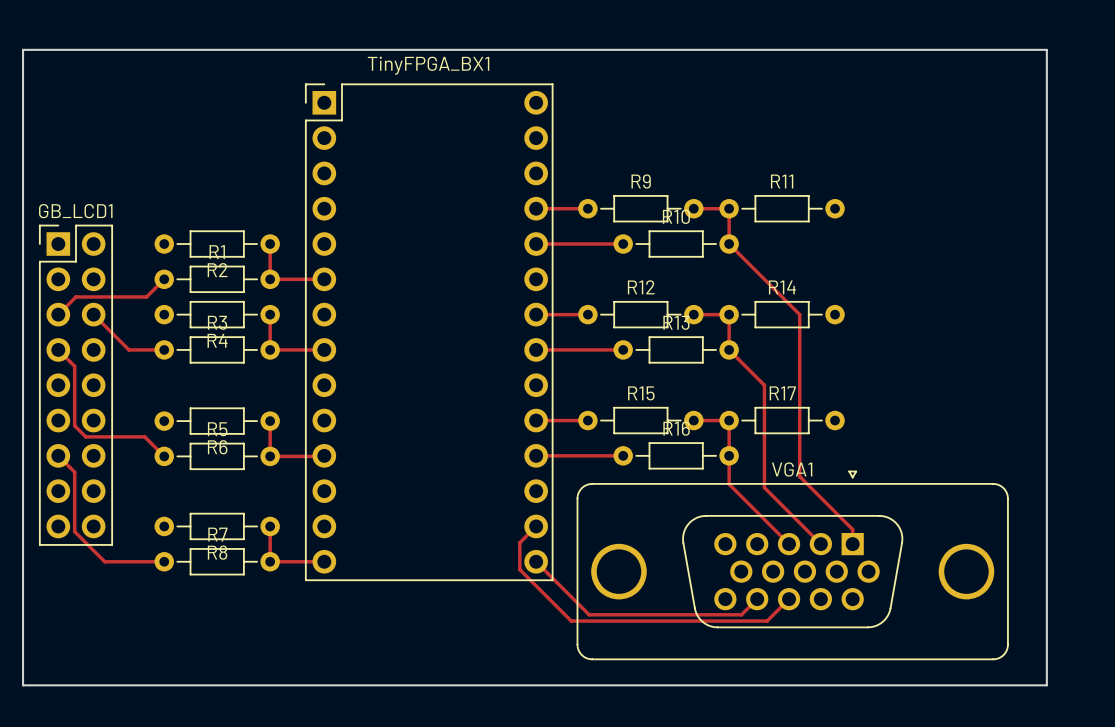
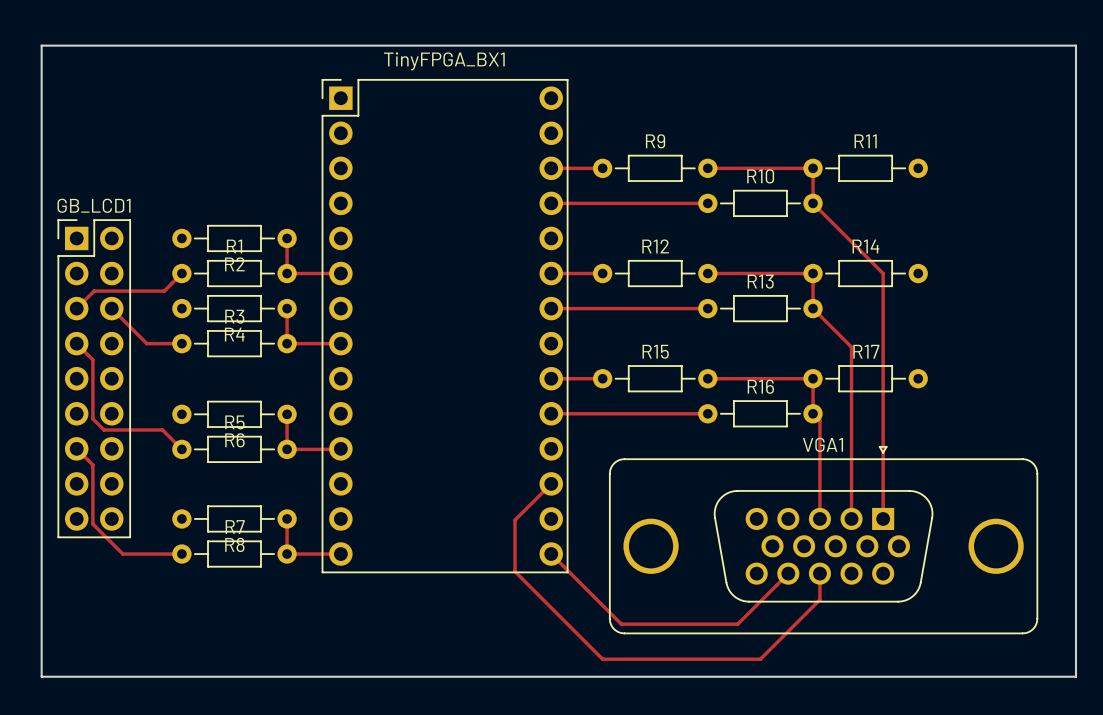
board edge: (1046, 49) (1046, 685) -> (1058, 45) (1076, 45) (1076, 676) (1058, 676)
track: none -> (551, 168) (602, 168)
track: none -> (707, 168) (813, 168) (813, 203) (883, 273) (883, 518)
track: none -> (602, 203) (707, 203)
R9 position: (640, 208) -> (655, 168)
track: (693, 208) (729, 208) (729, 244) (799, 314) (799, 385) -> (707, 378) (813, 378)
R11 position: (782, 208) -> (865, 168)
track: (536, 244) (623, 244) -> none
R10 position: (676, 244) -> (760, 203)
track: none -> (551, 273) (602, 273)
track: none -> (707, 273) (813, 273) (813, 308) (851, 347) (851, 518)
R12 position: (640, 314) -> (655, 273)
track: (693, 314) (729, 314) (729, 349) (764, 385) (764, 487) (820, 544) -> (707, 308) (602, 308)
R14 position: (782, 314) -> (865, 273)
track: (536, 349) (623, 349) -> none
R13 position: (676, 349) -> (760, 308)
track: none -> (551, 378) (602, 378)
R15 position: (640, 420) -> (655, 378)
track: (693, 420) (729, 420) (729, 484) (789, 544) -> (707, 413) (602, 413)
R17 position: (782, 420) -> (865, 378)
track: (799, 420) (799, 476) (852, 529) (852, 544) -> (813, 413) (819, 420) (819, 518)
track: (536, 455) (623, 455) -> none
R16 position: (676, 455) -> (760, 413)
track: none -> (551, 483) (515, 520) (515, 571) (602, 659) (760, 659) (819, 599) (819, 573)
track: (536, 526) (519, 542) (519, 569) (571, 621) (767, 621) (789, 599) -> none
VGA1 position: (792, 565) -> (823, 540)
track: none -> (788, 573) (770, 591)
track: (589, 614) (741, 614) -> (603, 606) (621, 624) (737, 624) (755, 606)

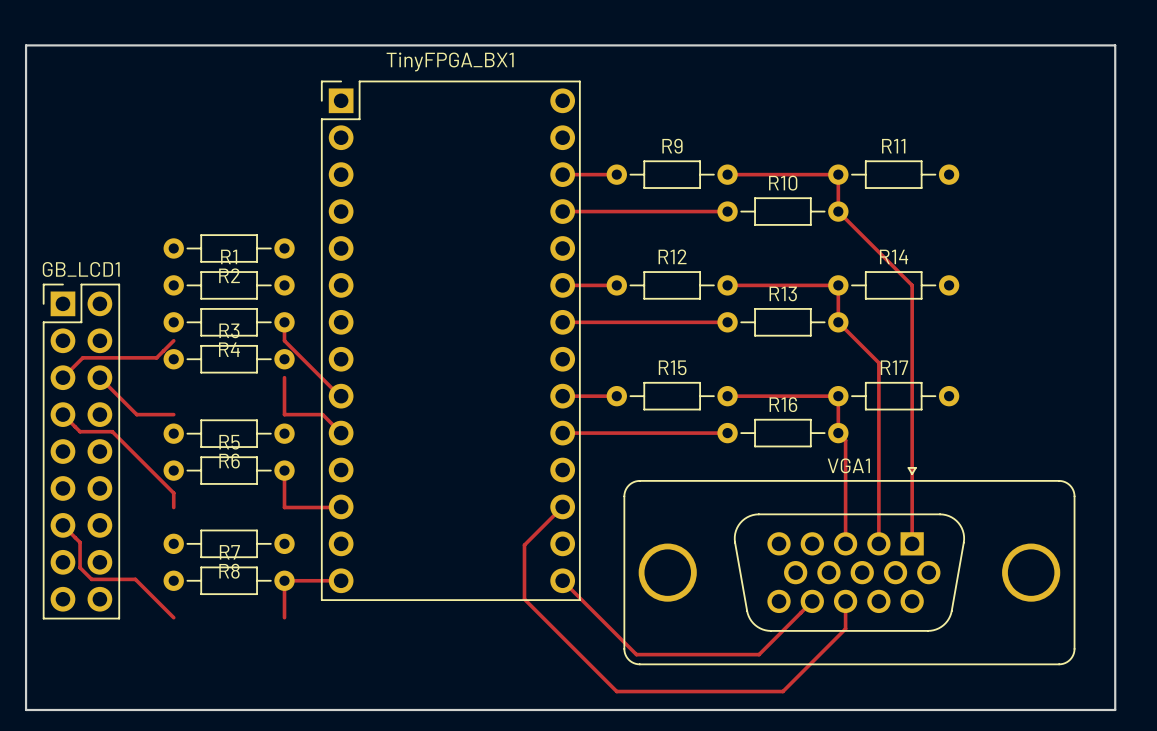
track: (287, 238) (287, 273) (340, 273) -> none
track: (181, 273) (164, 291) (94, 291) (76, 308) -> none
track: (111, 308) (146, 343) (181, 343) -> (99, 377) (136, 414) (173, 414)
track: none -> (173, 340) (156, 357) (82, 357) (62, 377)
track: (287, 326) (287, 343) (340, 343) -> (284, 340) (339, 396)
track: (76, 343) (92, 359) (92, 418) (103, 430) (162, 430) (181, 449) -> none
track: none -> (284, 377) (284, 414) (322, 414) (341, 433)
GB_LCD1 position: (94, 378) -> (81, 451)
track: none -> (62, 414) (80, 431) (112, 431) (173, 493) (173, 507)
track: (287, 414) (287, 449) (340, 448) -> none
track: (76, 448) (92, 465) (92, 517) -> (62, 525) (80, 542)
track: none -> (284, 470) (284, 507) (340, 507)
track: (287, 518) (287, 554) -> (284, 617) (284, 580)
track: (92, 524) (122, 554) (181, 554) -> (80, 549) (80, 567) (91, 579) (135, 579) (173, 617)

